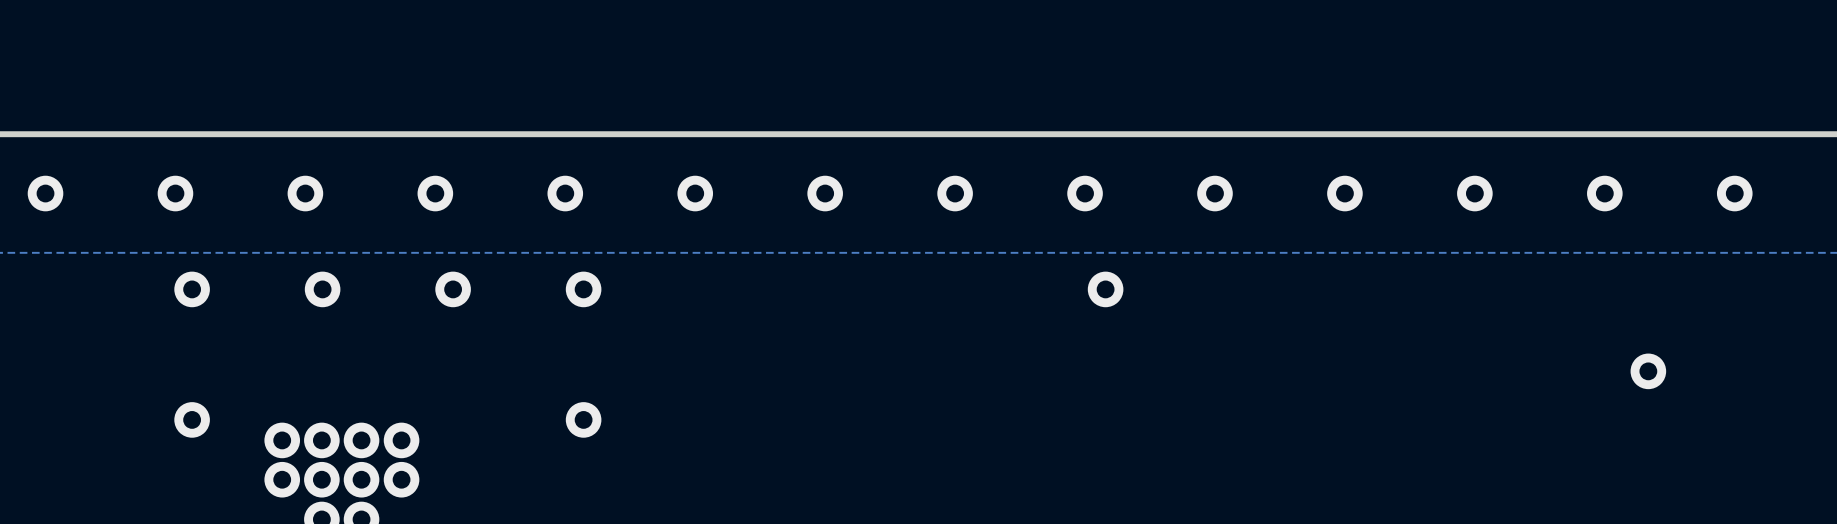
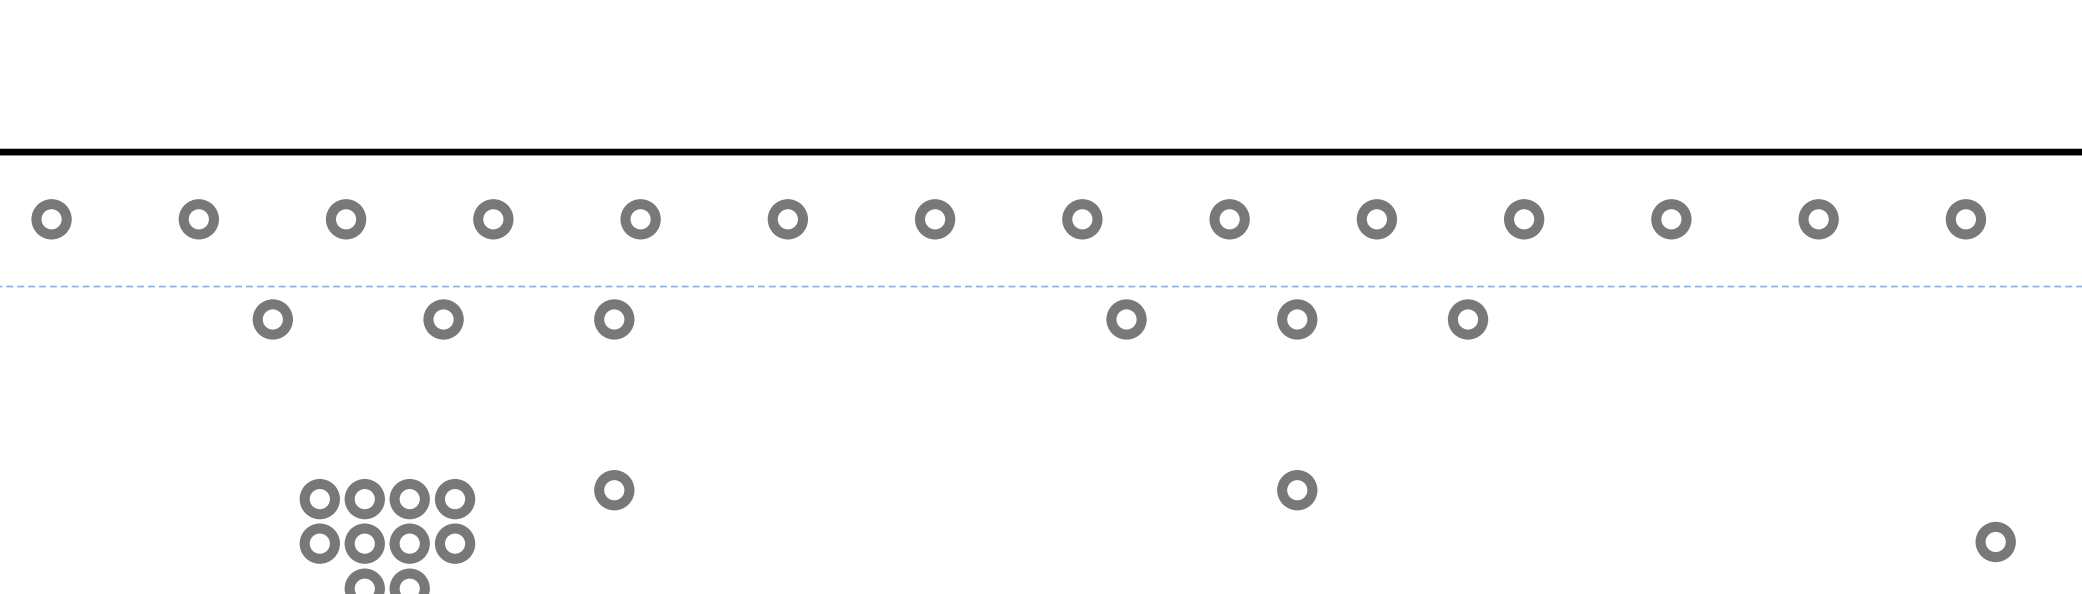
via: none -> (272, 319)
via: none -> (443, 319)
via: none -> (1126, 319)
via: none -> (1468, 319)
via: (192, 289) -> none
via: (322, 289) -> none
via: (453, 289) -> none
via position: (583, 289) -> (614, 319)
via position: (1105, 289) -> (1297, 319)
via: (1648, 371) -> none
via: (192, 419) -> none
via position: (583, 419) -> (614, 490)
via: none -> (1297, 490)
via: none -> (1995, 541)

